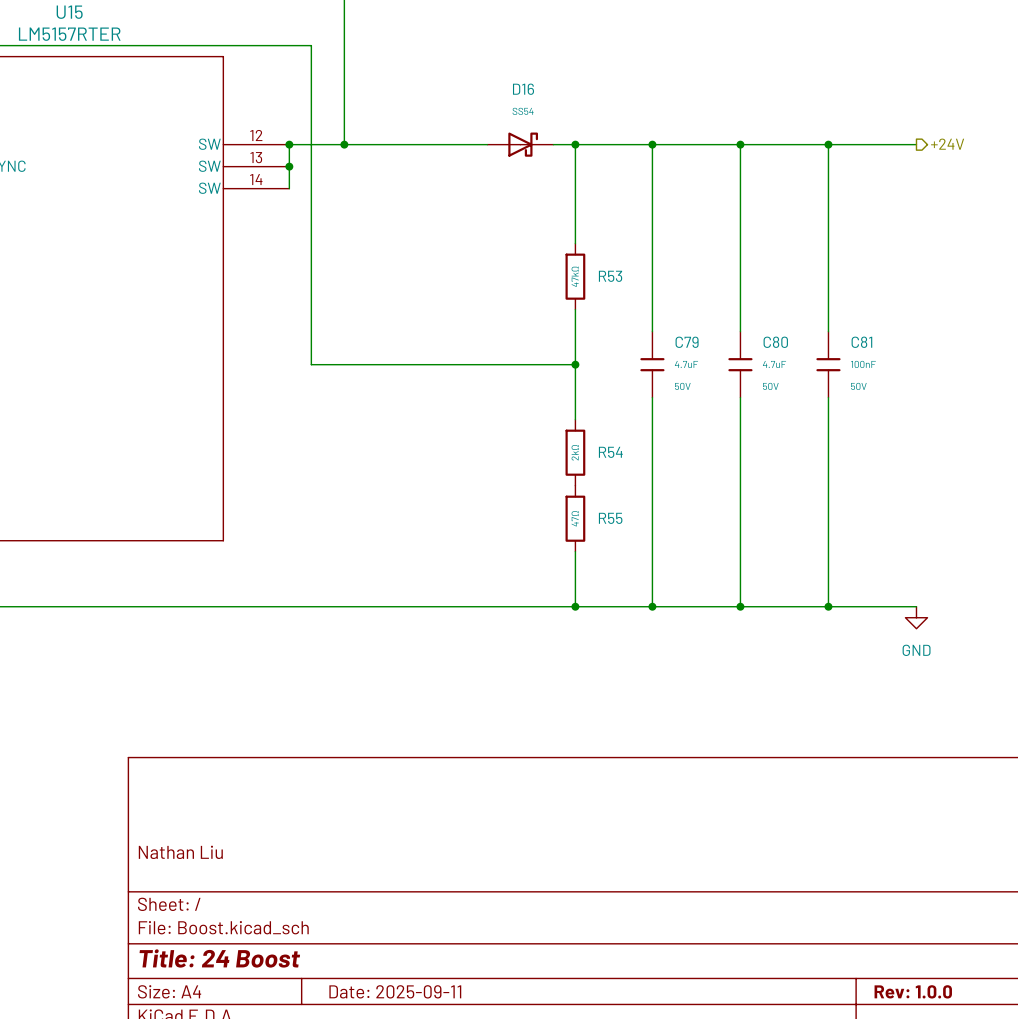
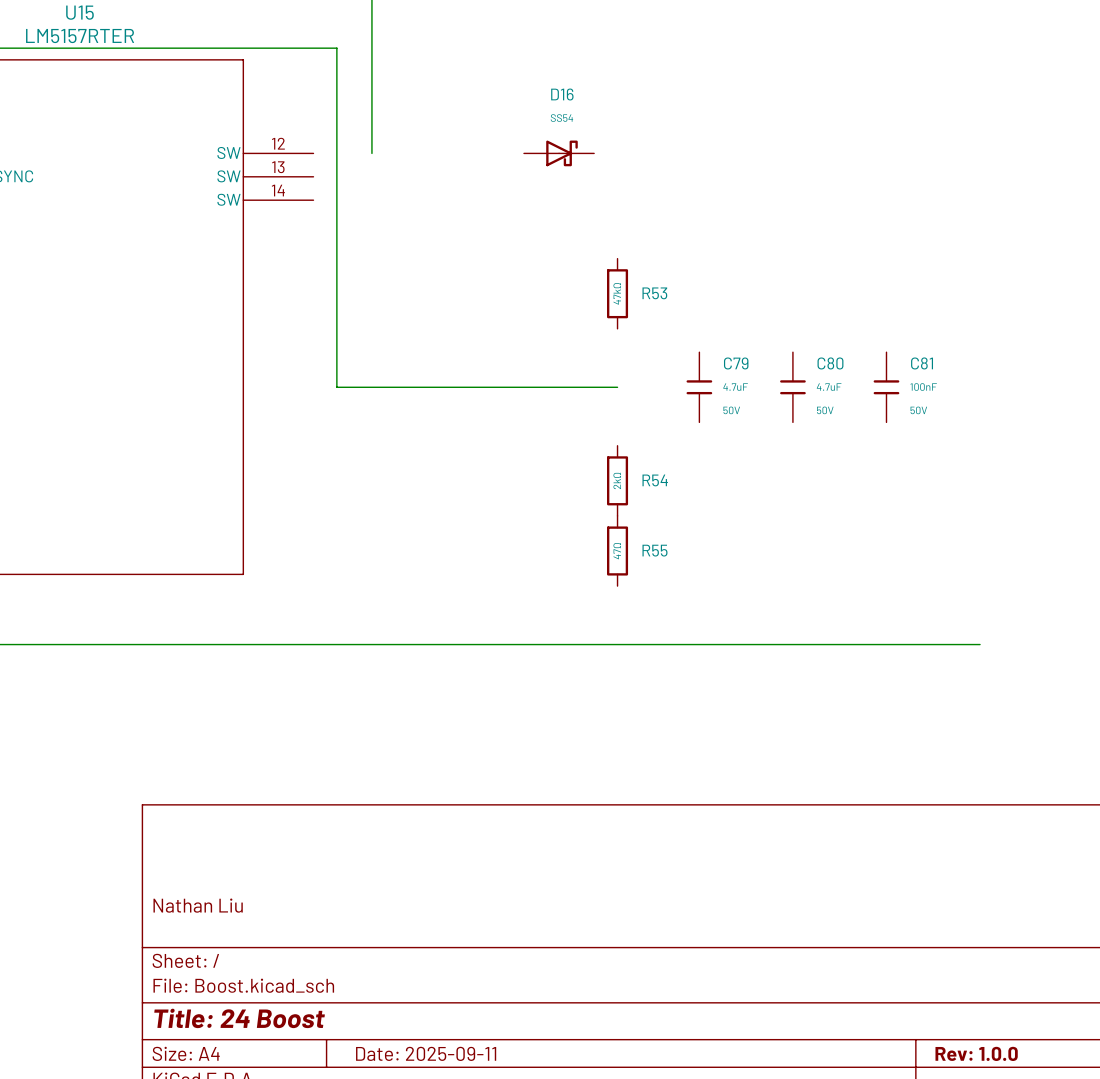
junction: (289, 144) -> none
junction: (344, 144) -> none
wire: (487, 144) (289, 144) (289, 188) -> none
wire: (553, 144) (916, 144) -> none
wire: (575, 144) (575, 243) -> none
junction: (575, 144) -> none
wire: (652, 144) (652, 331) -> none
junction: (652, 144) -> none
wire: (740, 144) (740, 331) -> none
junction: (740, 144) -> none
wire: (828, 144) (828, 331) -> none
junction: (828, 144) -> none
hierarchical label: +24V (947, 144) -> none
junction: (289, 166) -> none
wire: (575, 309) (575, 419) -> none
junction: (575, 364) -> none
wire: (652, 397) (652, 606) -> none
wire: (740, 397) (740, 606) -> none
wire: (828, 397) (828, 606) -> none
wire: (575, 551) (575, 606) -> none
junction: (575, 606) -> none
junction: (652, 606) -> none
junction: (740, 606) -> none
junction: (828, 606) -> none
power symbol: GND (916, 617) -> none

